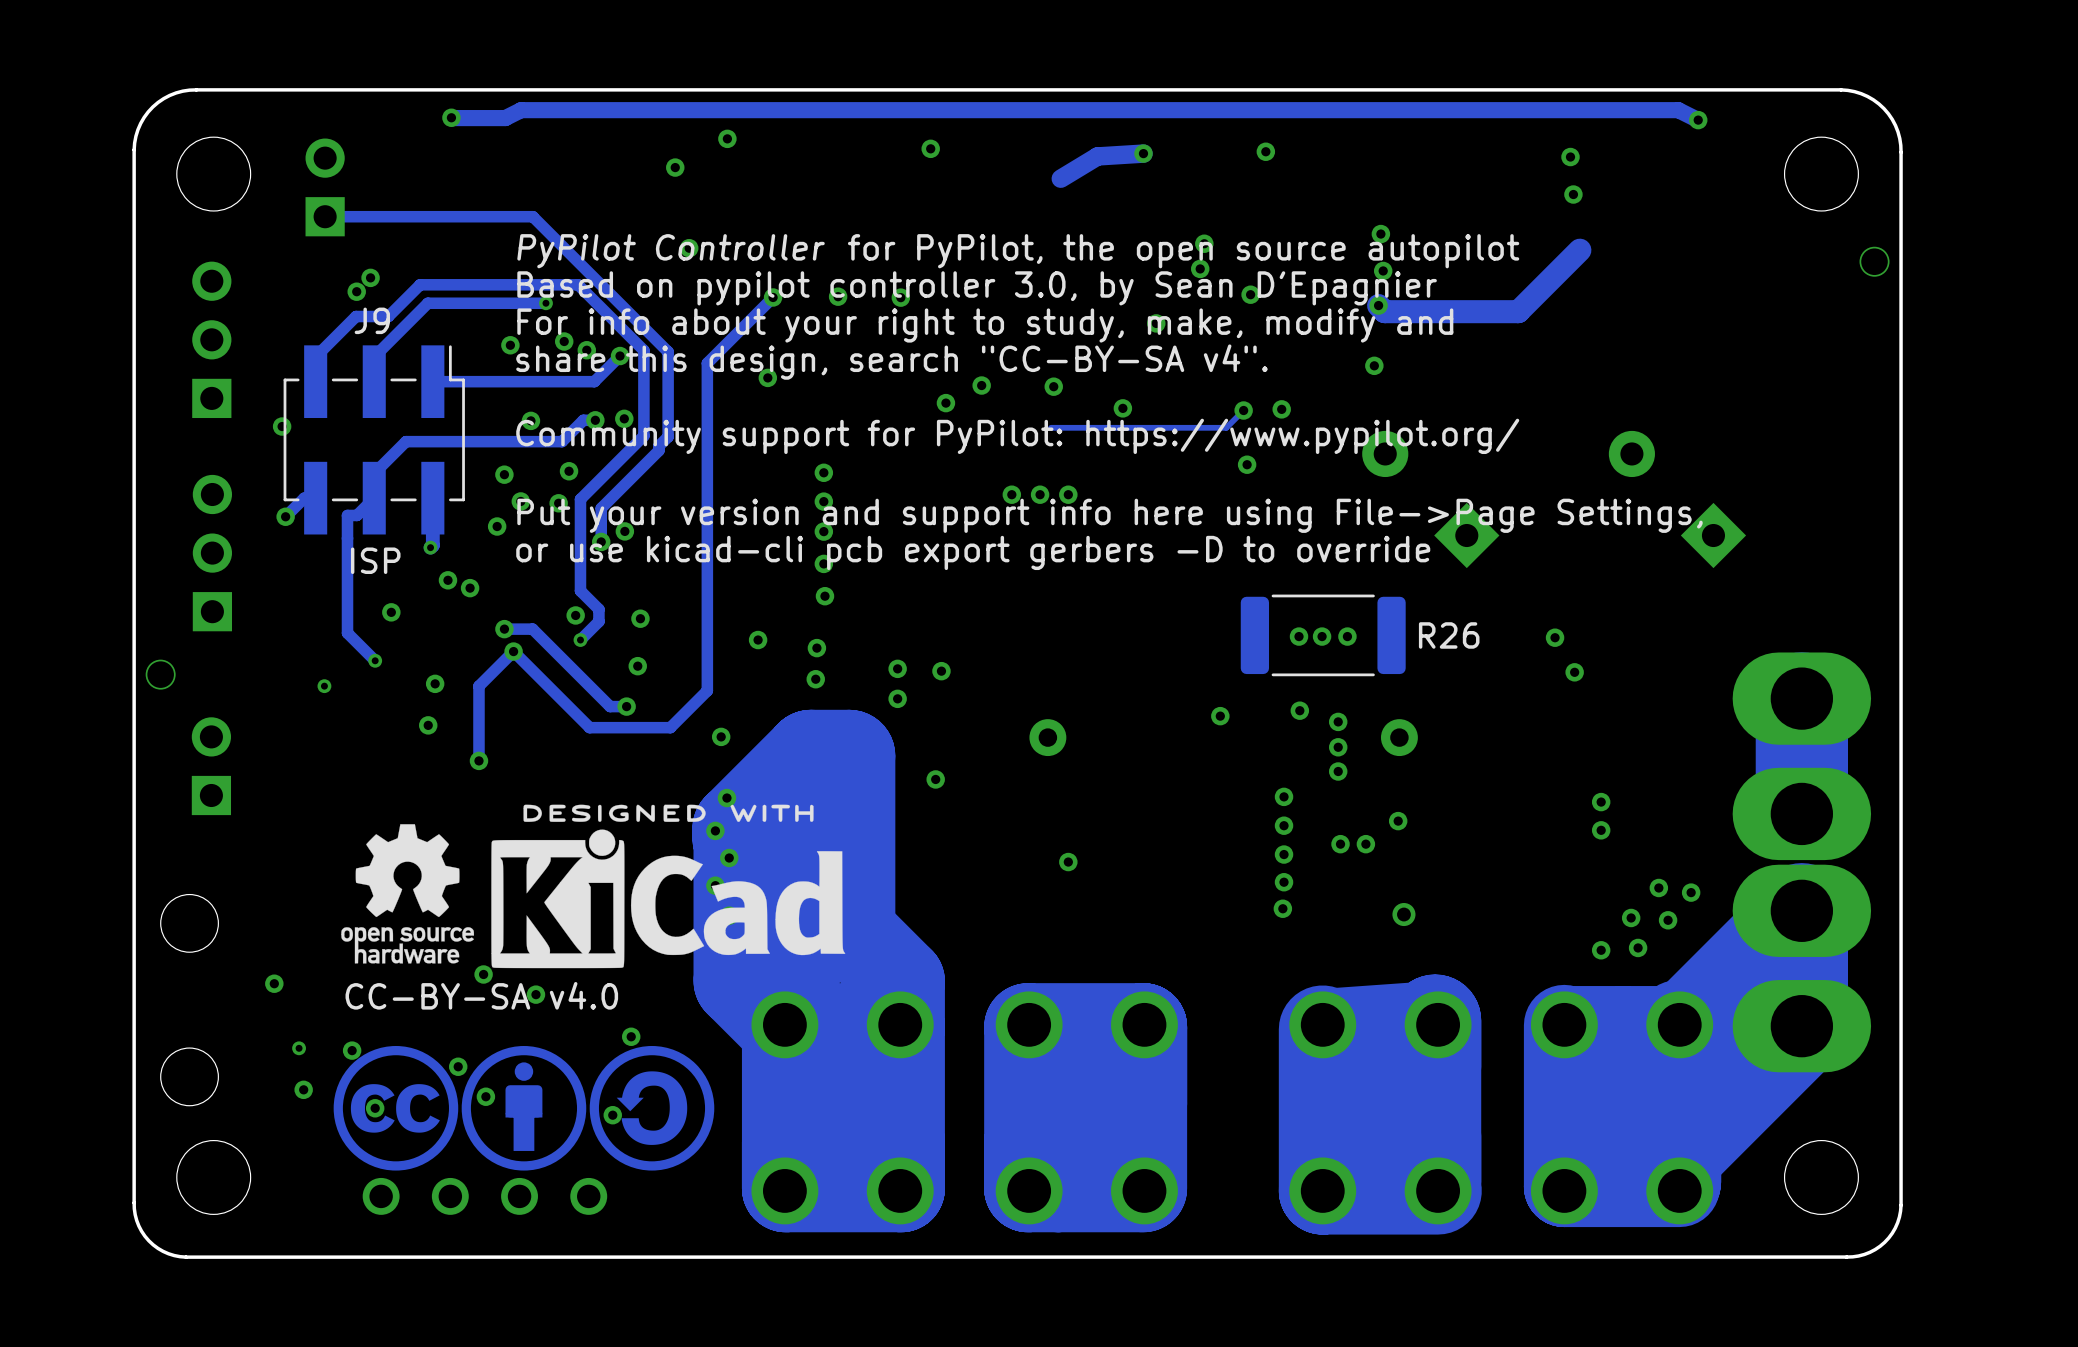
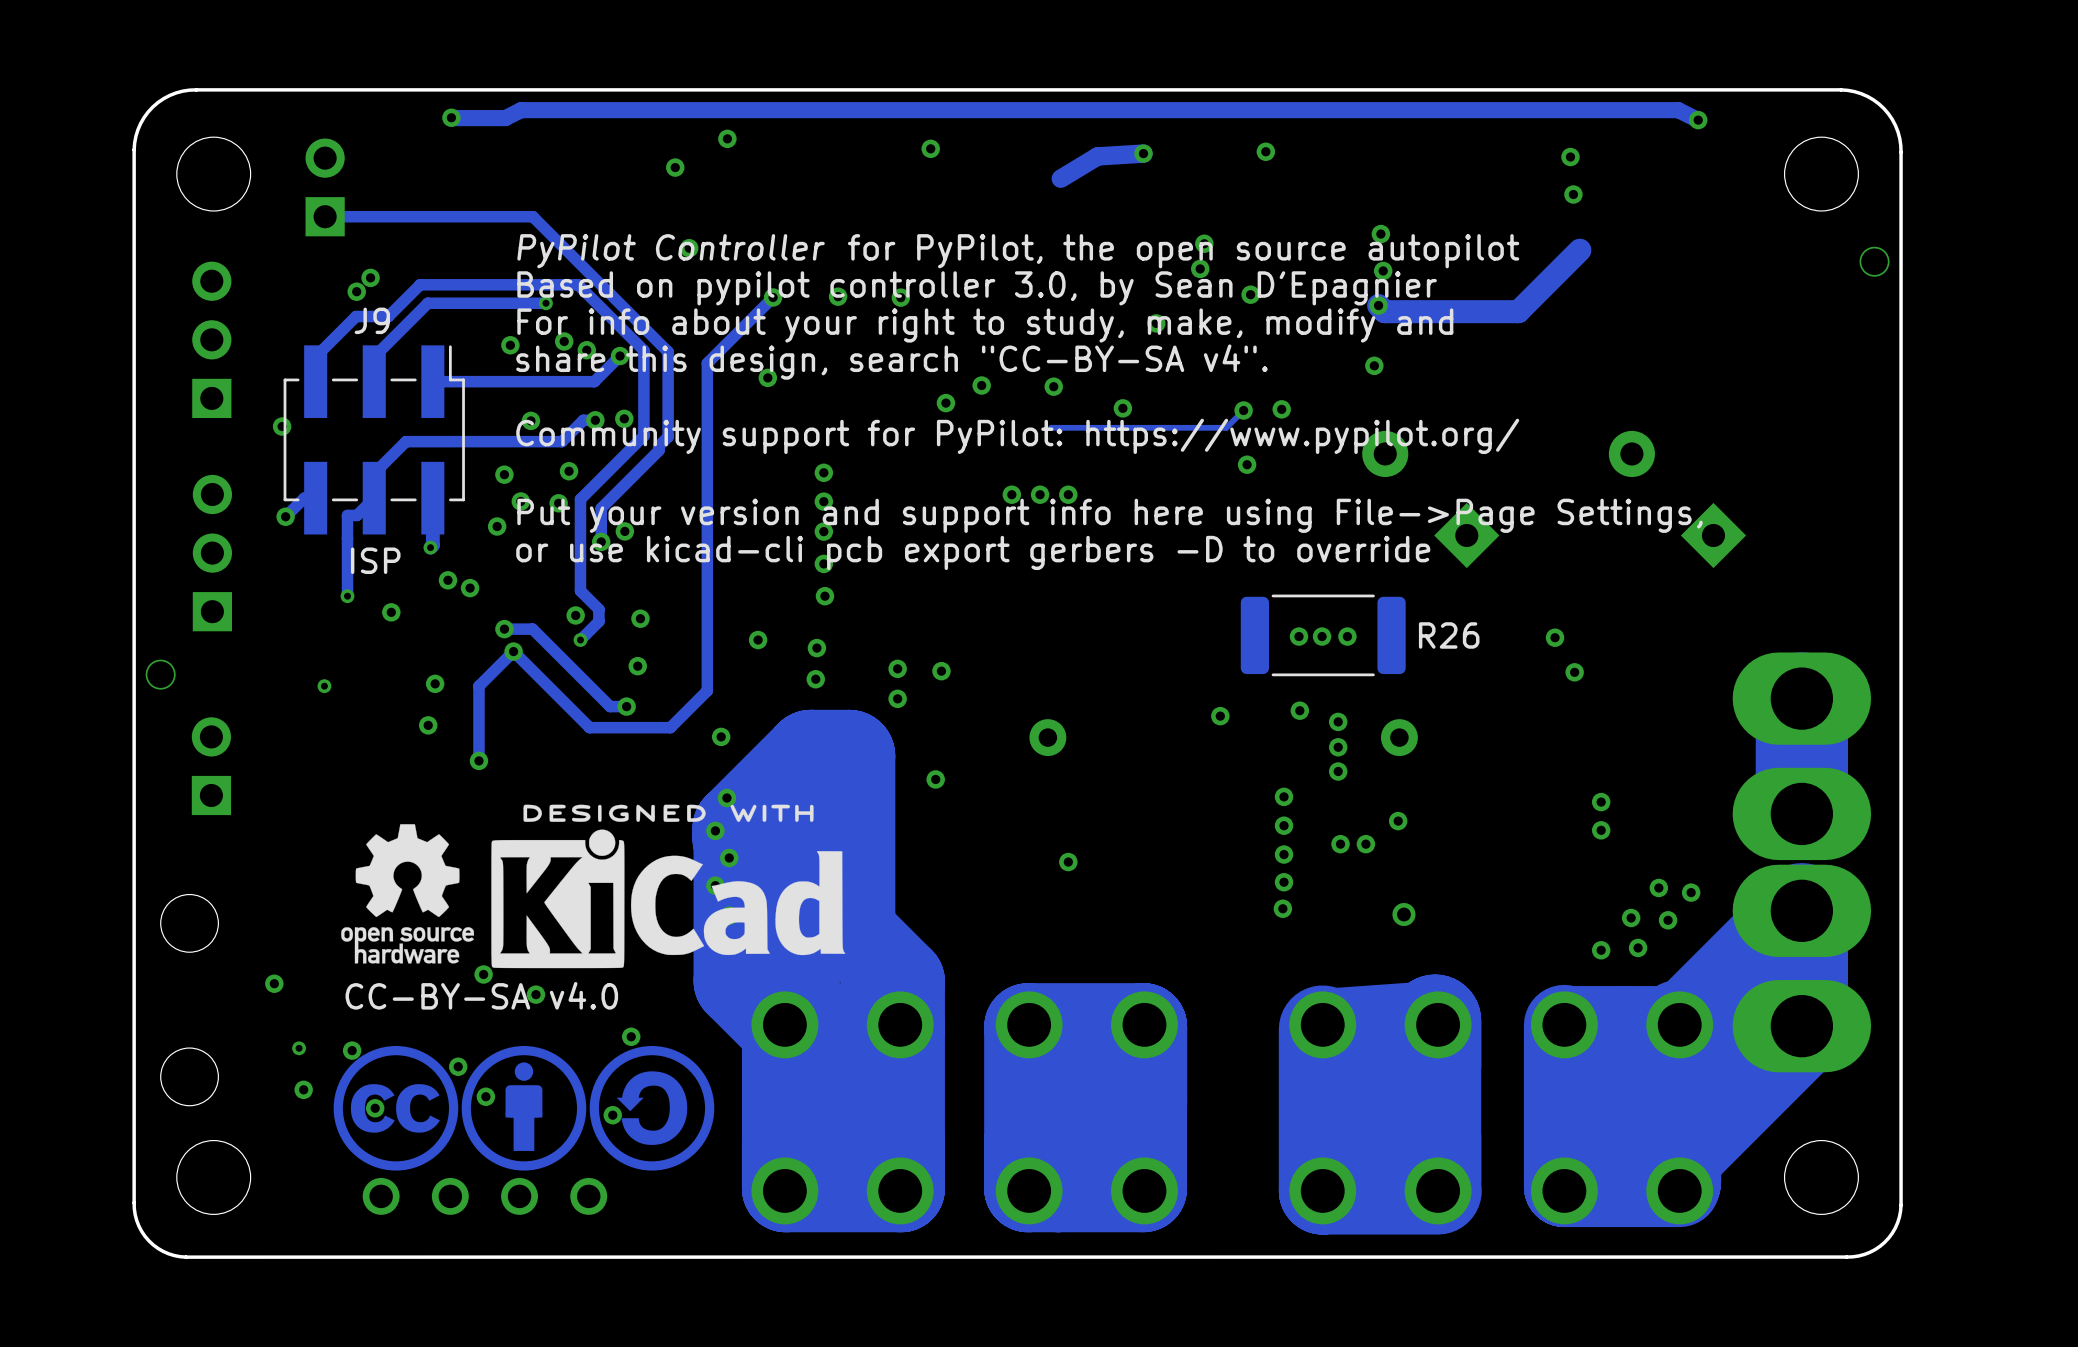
track: (347, 596) (347, 633) (375, 660) -> none
via position: (375, 660) -> (347, 596)

